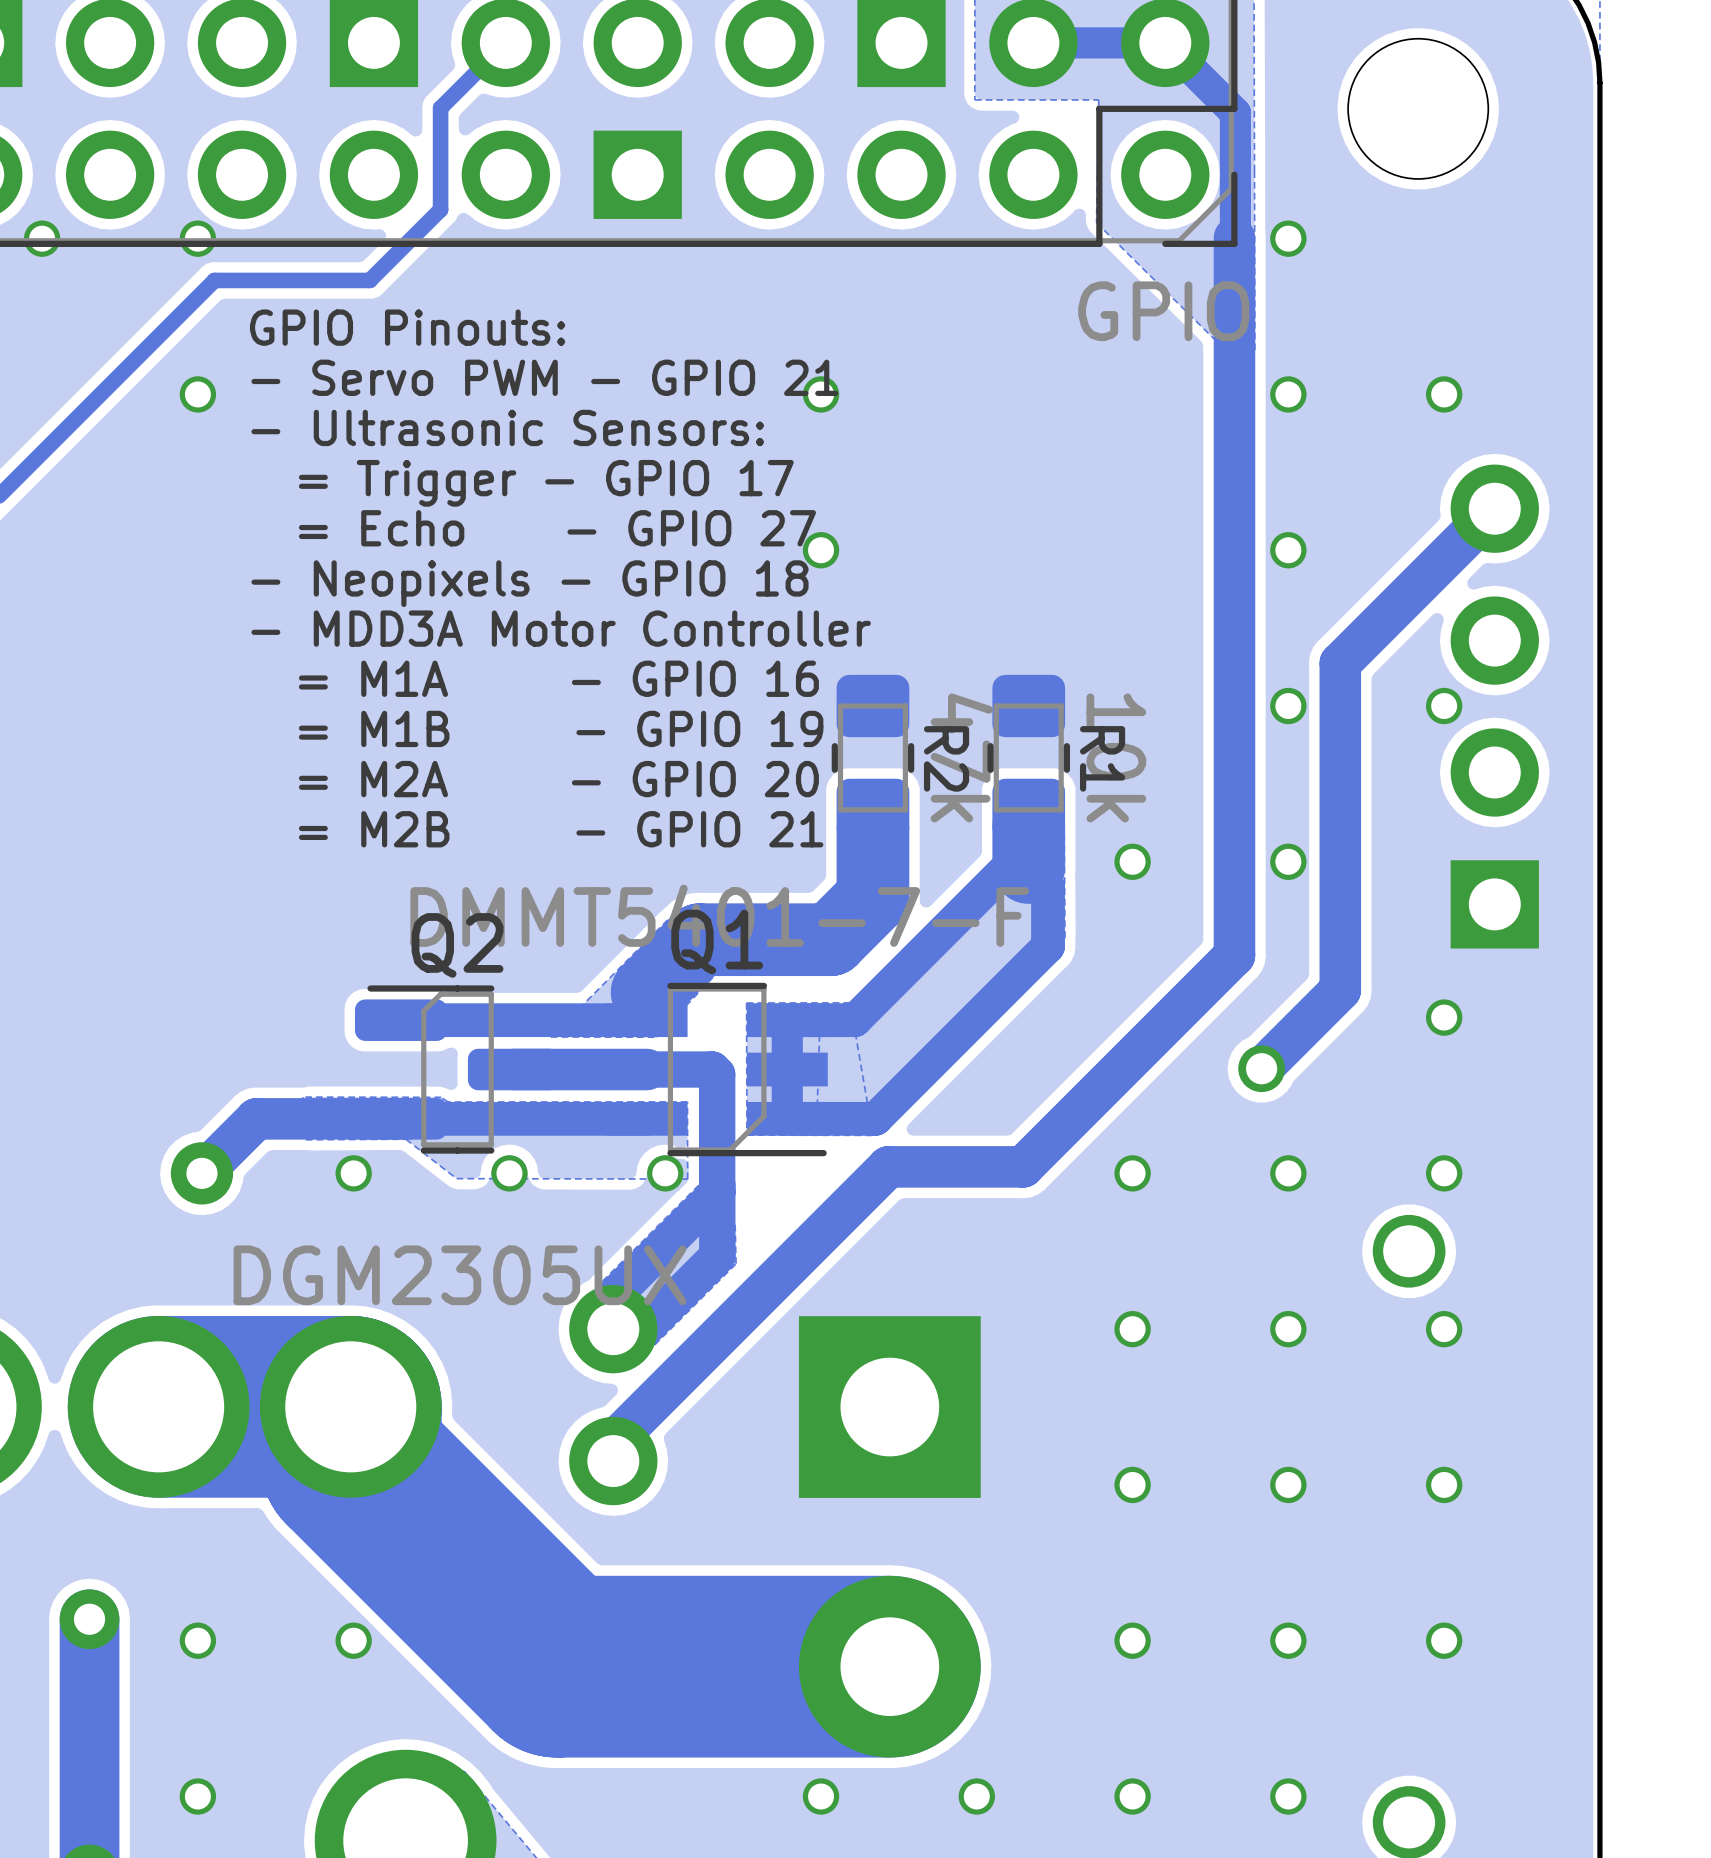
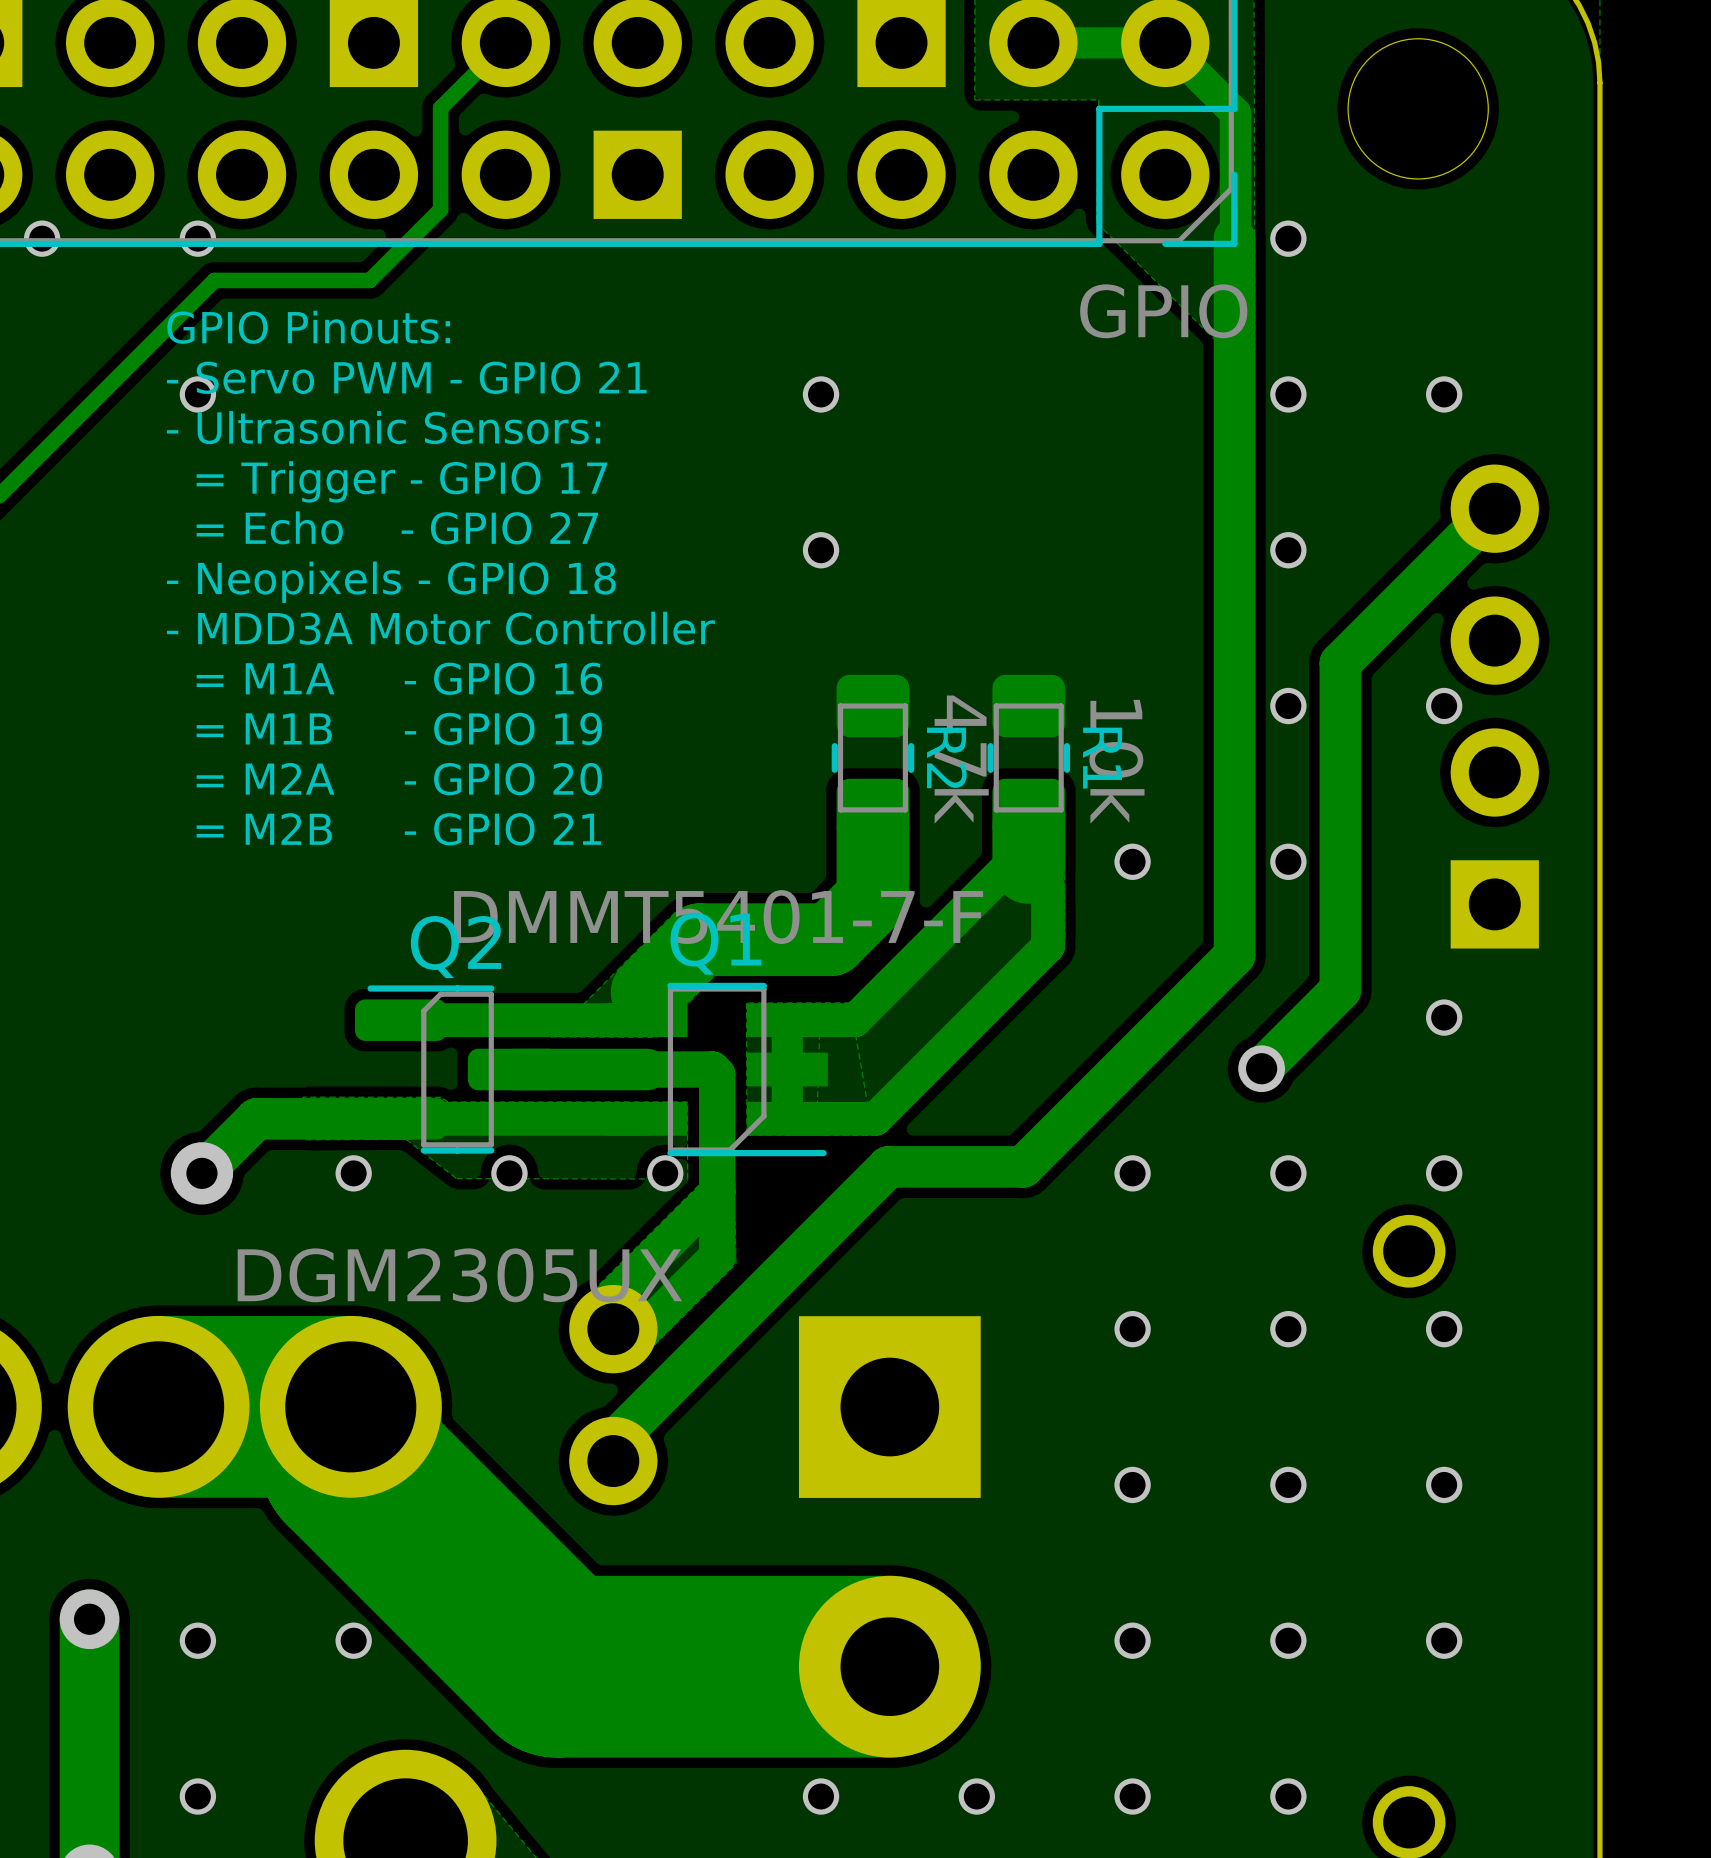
text position: GPIO Pinouts: (407, 327) -> GPIO Pinouts: (308, 327)
text position: - Servo PWM - GPIO 21 (544, 377) -> - Servo PWM - GPIO 21 (406, 377)
text position: - Ultrasonic Sensors: (507, 427) -> - Ultrasonic Sensors: (383, 427)
text position: = Trigger - GPIO 17 (546, 483) -> = Trigger - GPIO 17 (401, 481)
text position: = Echo - GPIO 27 (557, 528) -> = Echo - GPIO 27 (397, 527)
text position: - Neopixels - GPIO 18 (529, 583) -> - Neopixels - GPIO 18 (391, 582)
text position: - MDD3A Motor Controller (561, 628) -> - MDD3A Motor Controller (440, 628)
text position: = M1A - GPIO 16 (558, 678) -> = M1A - GPIO 16 (399, 678)
text position: = M1B - GPIO 19 (561, 728) -> = M1B - GPIO 19 (399, 728)
text position: = M2A - GPIO 20 (558, 779) -> = M2A - GPIO 20 (399, 779)
text position: = M2B - GPIO 21 (561, 829) -> = M2B - GPIO 21 (398, 829)

